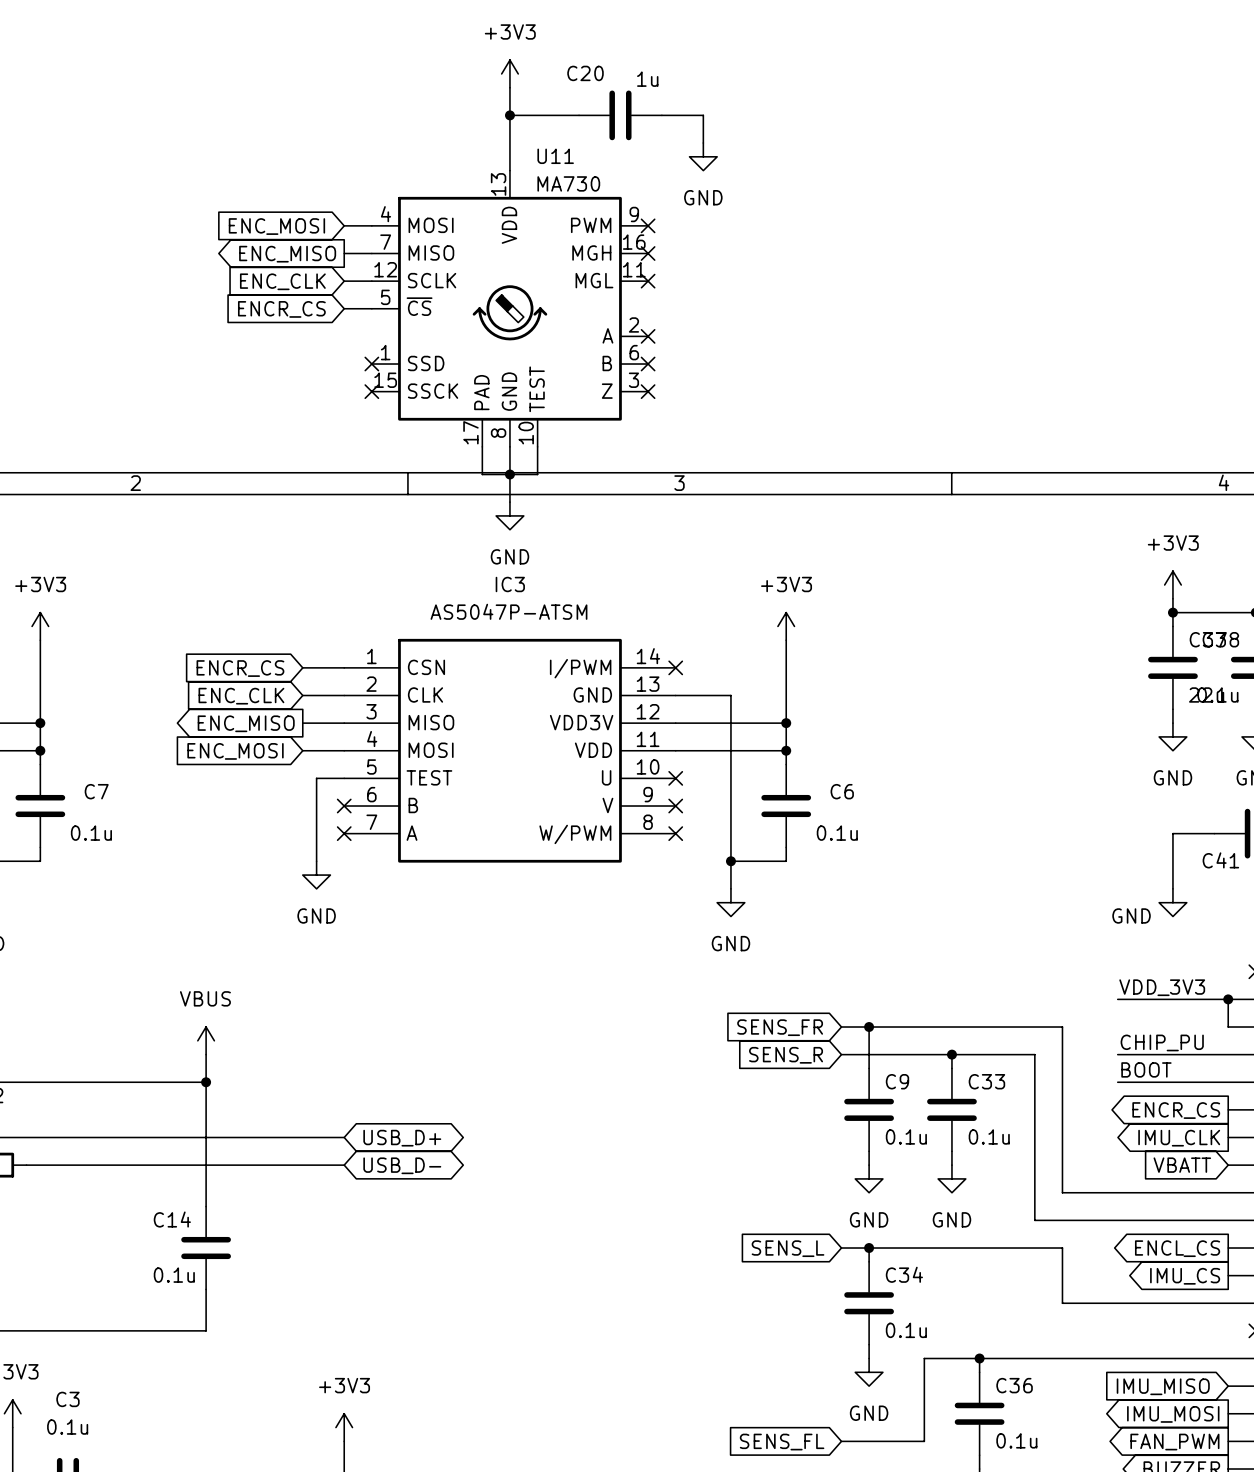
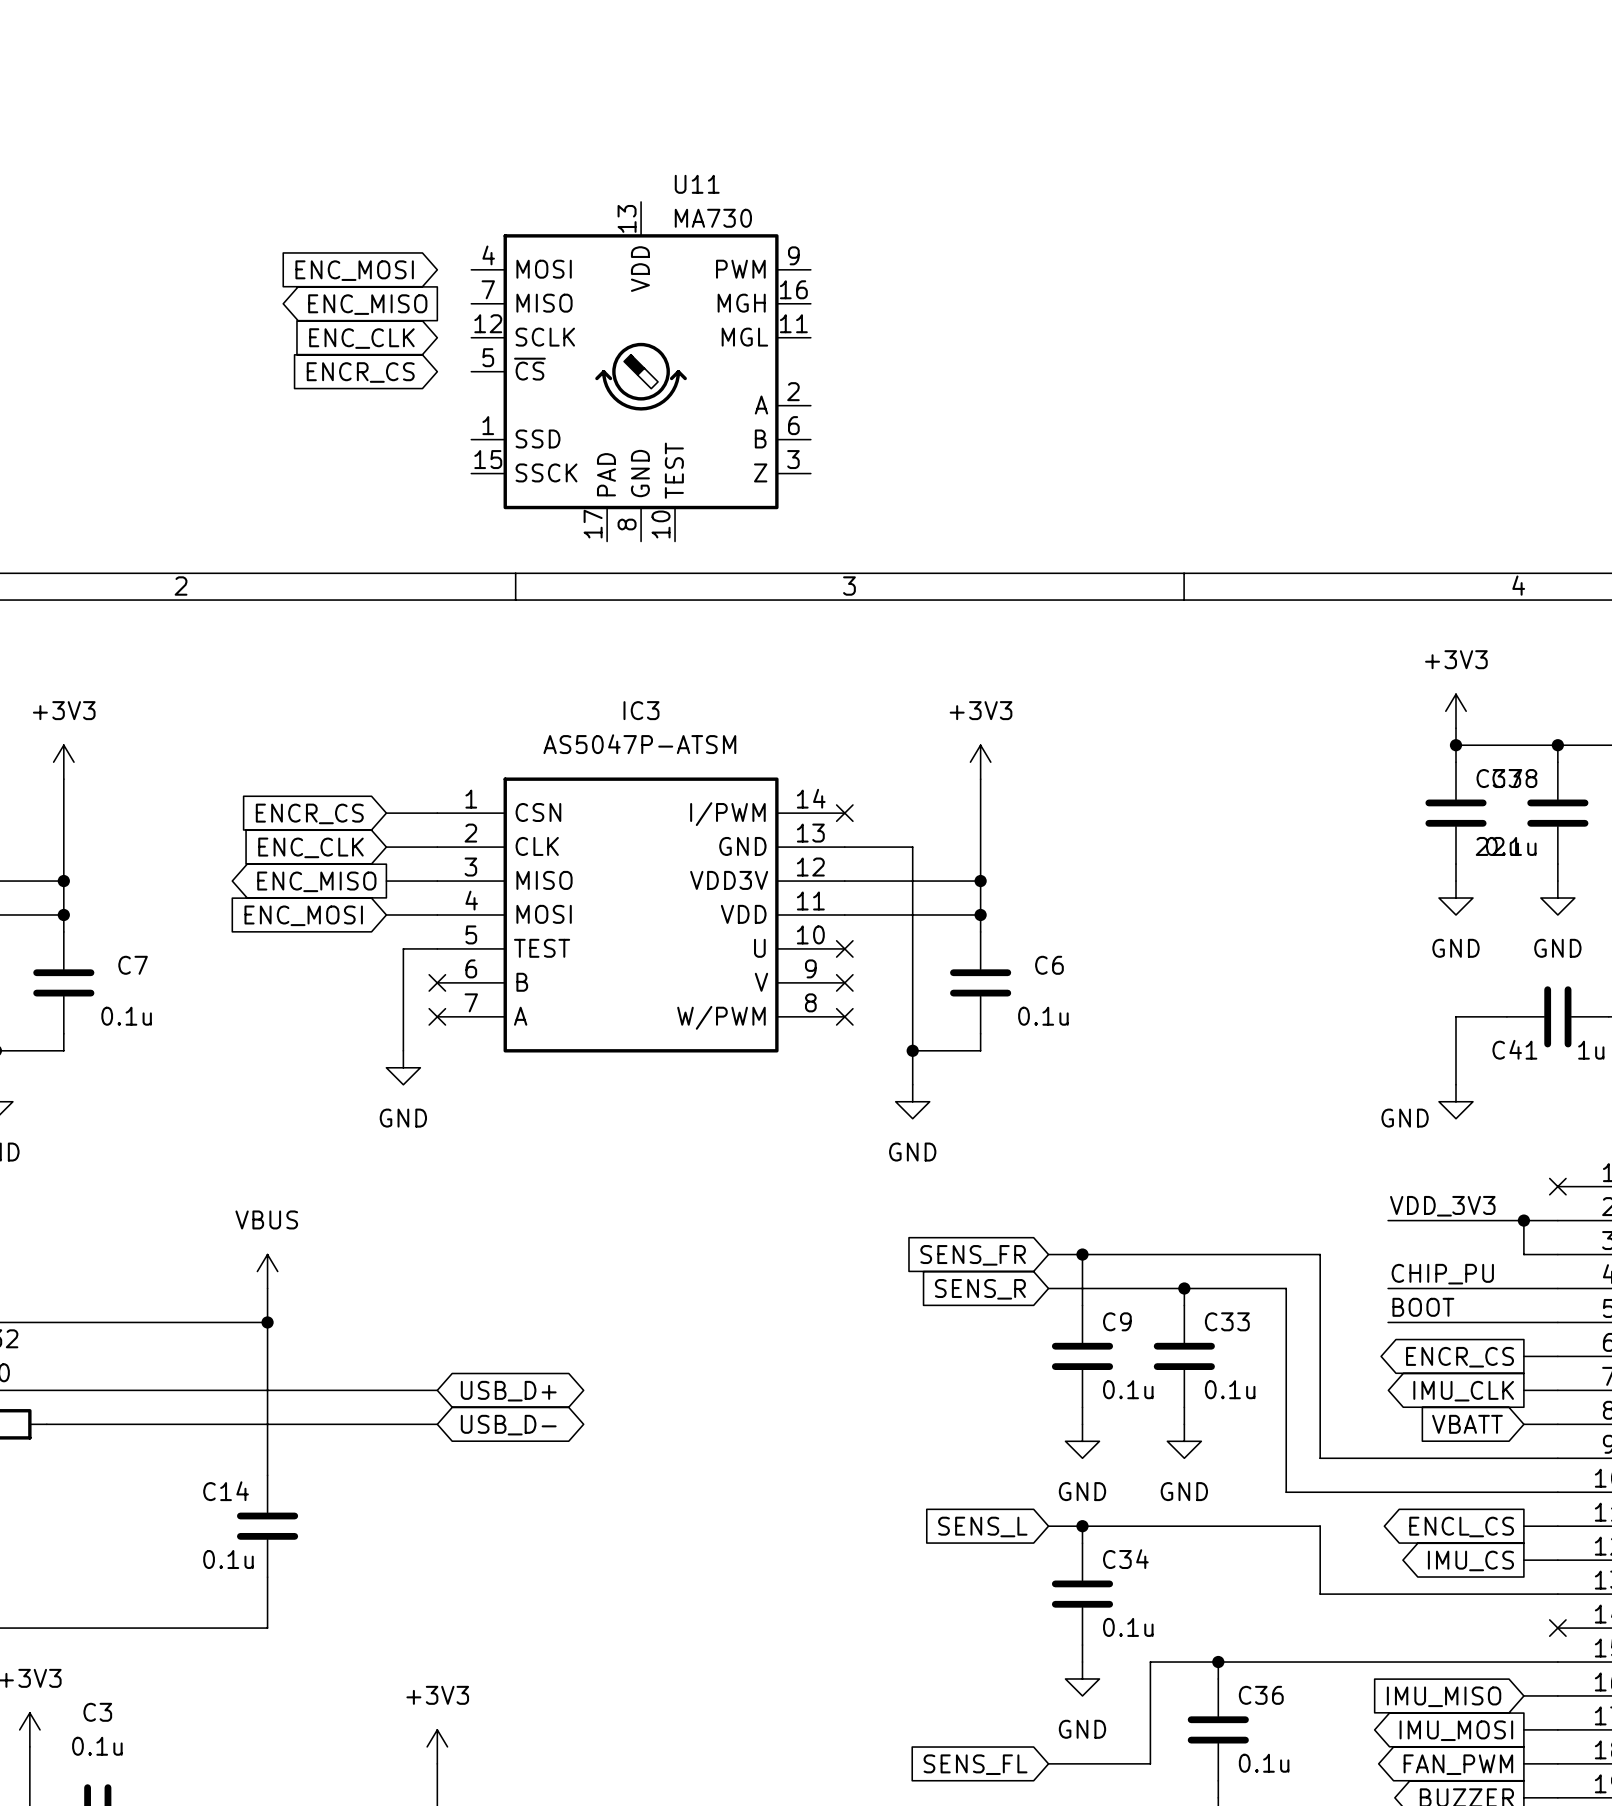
power symbol: +3V3 (509, 73) -> none
wire: (509, 87) (509, 170) -> none
wire: (509, 115) (579, 115) -> none
junction: (509, 115) -> none
C20: 1u (620, 115) -> none
wire: (661, 115) (703, 115) (703, 143) -> none
power symbol: GND (703, 156) -> none
wire: (344, 225) (371, 225) -> none
no-connect mark: (648, 225) -> none
wire: (344, 253) (371, 253) -> none
no-connect mark: (648, 253) -> none
wire: (344, 281) (371, 281) -> none
no-connect mark: (648, 281) -> none
wire: (344, 308) (371, 308) -> none
no-connect mark: (648, 336) -> none
no-connect mark: (371, 364) -> none
no-connect mark: (648, 364) -> none
no-connect mark: (371, 391) -> none
no-connect mark: (648, 391) -> none
wire: (482, 446) (482, 474) (537, 474) (537, 446) -> none
wire: (509, 446) (509, 502) -> none
junction: (509, 474) -> none
power symbol: GND (509, 515) -> none

